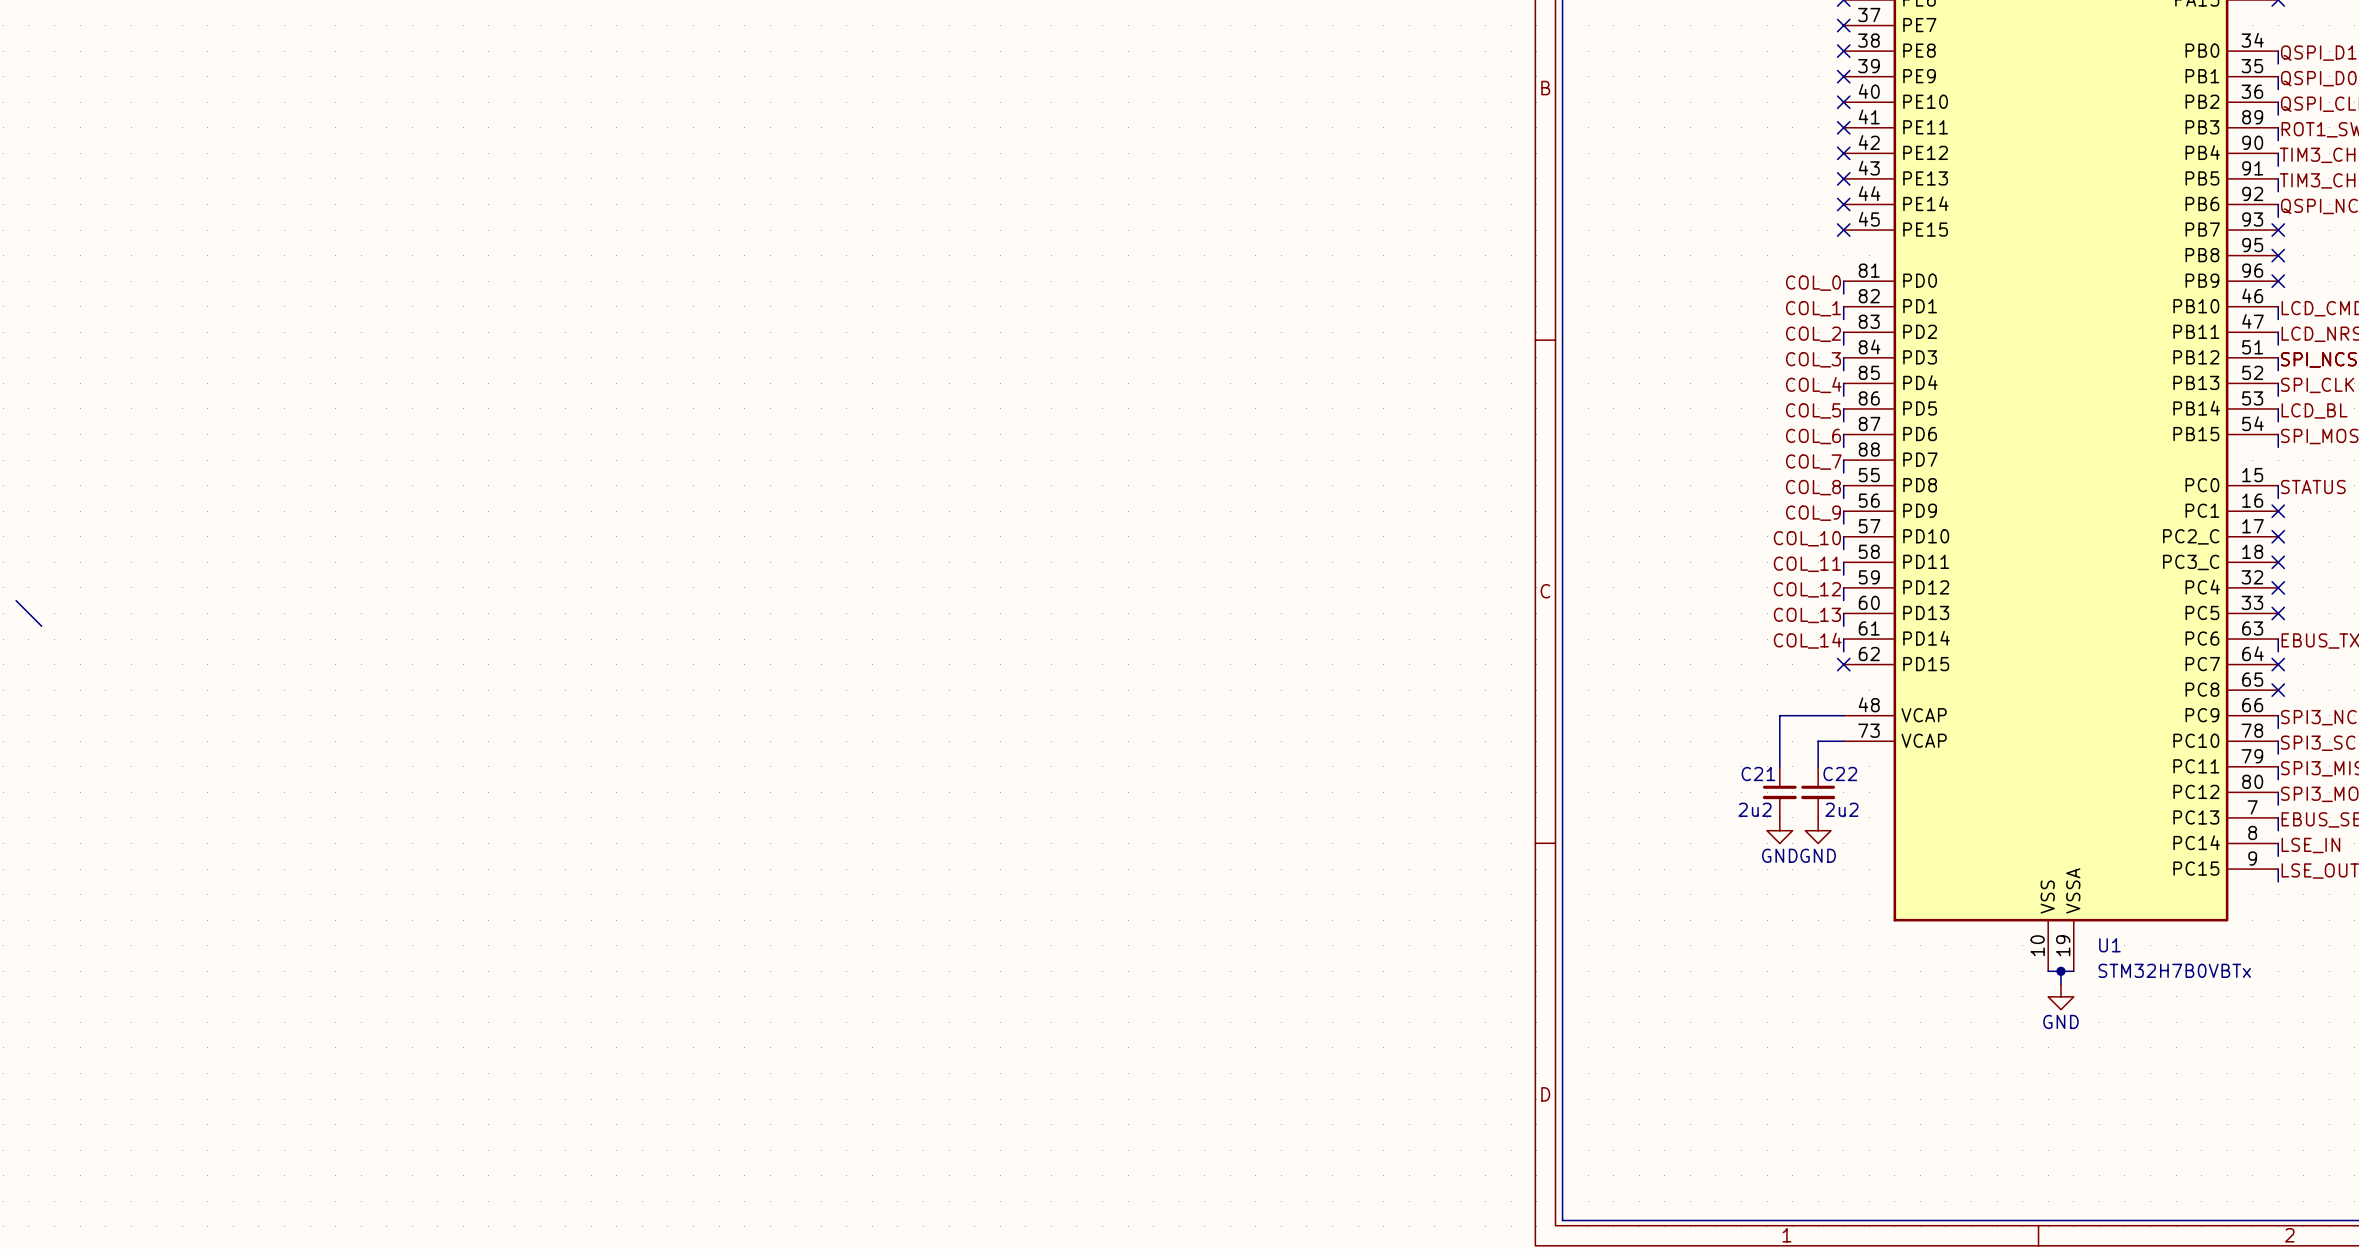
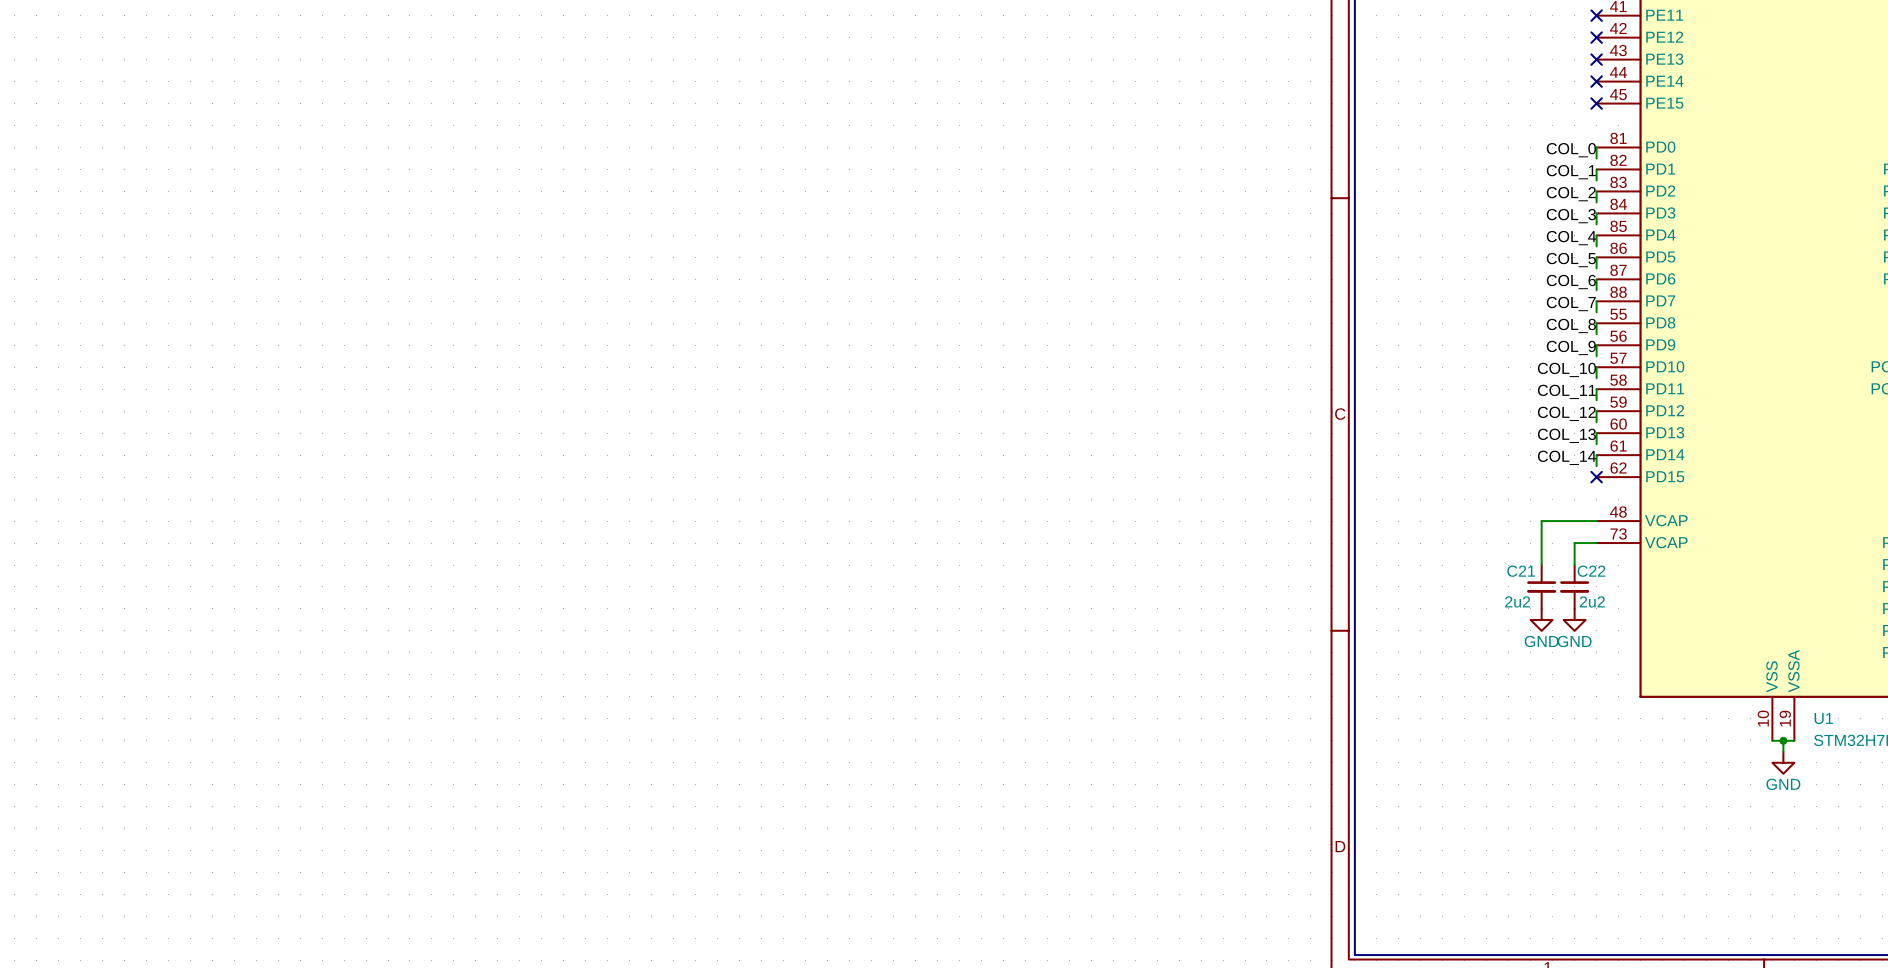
wire: (16, 600) (41, 626) -> none

